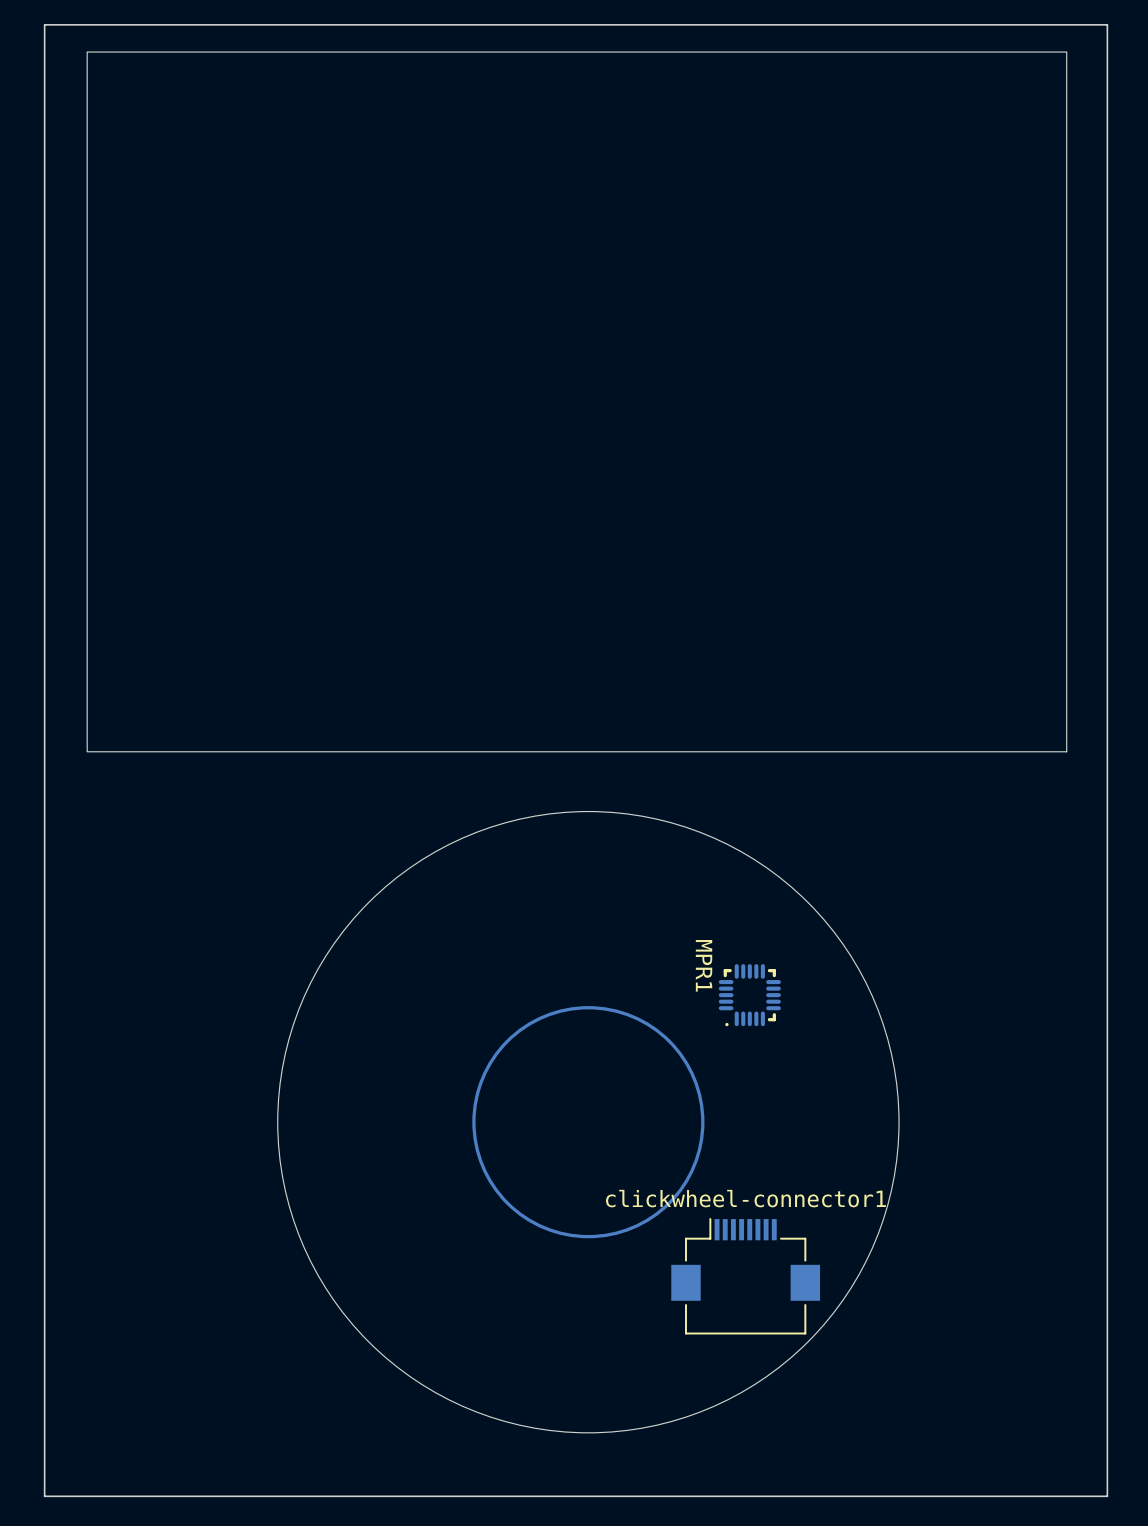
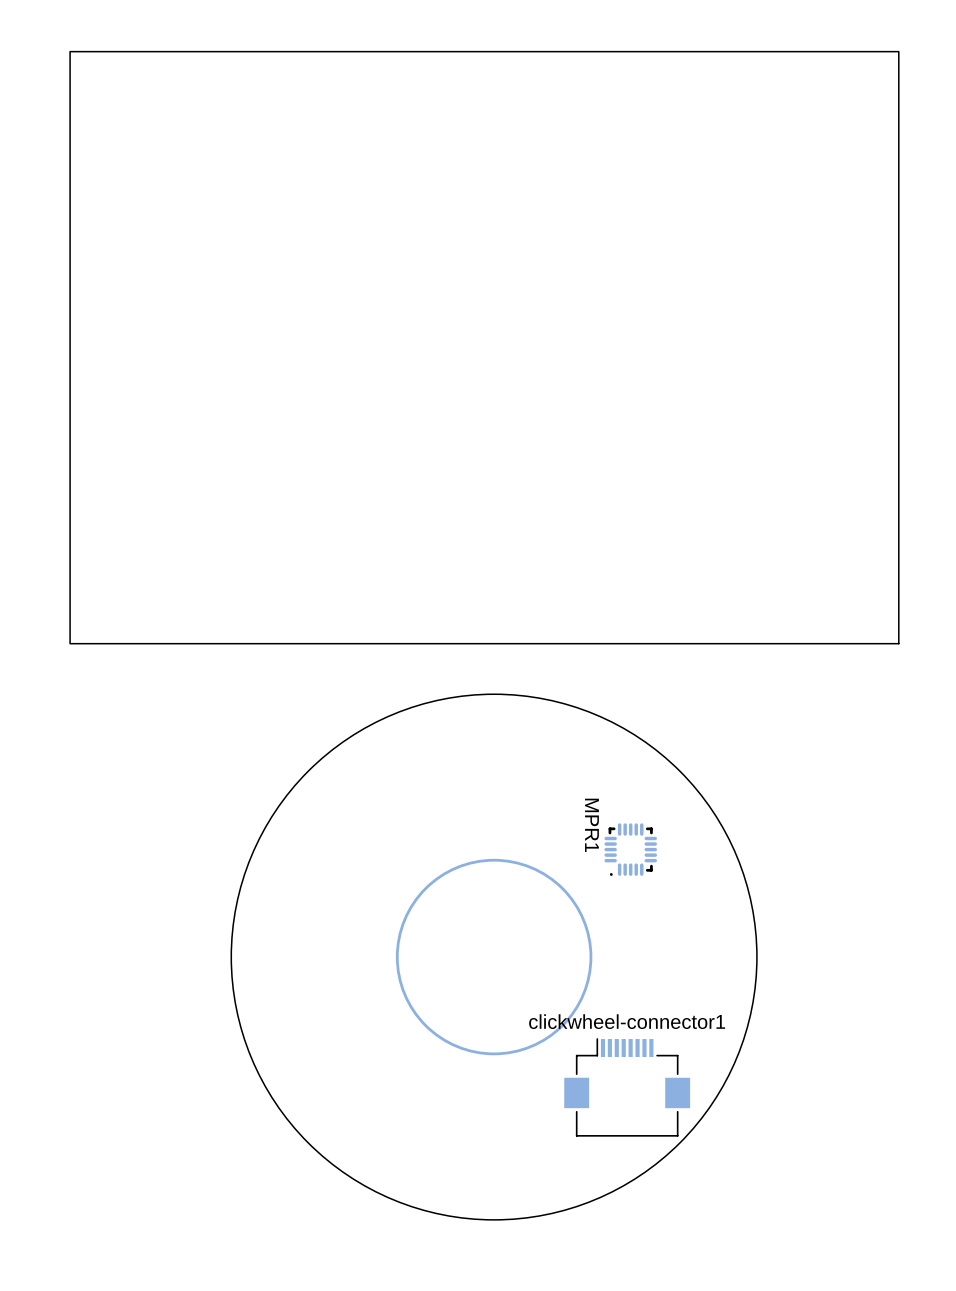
board edge: (1107, 24) (44, 24) (44, 1496) (1107, 1496) (1107, 24) -> none

